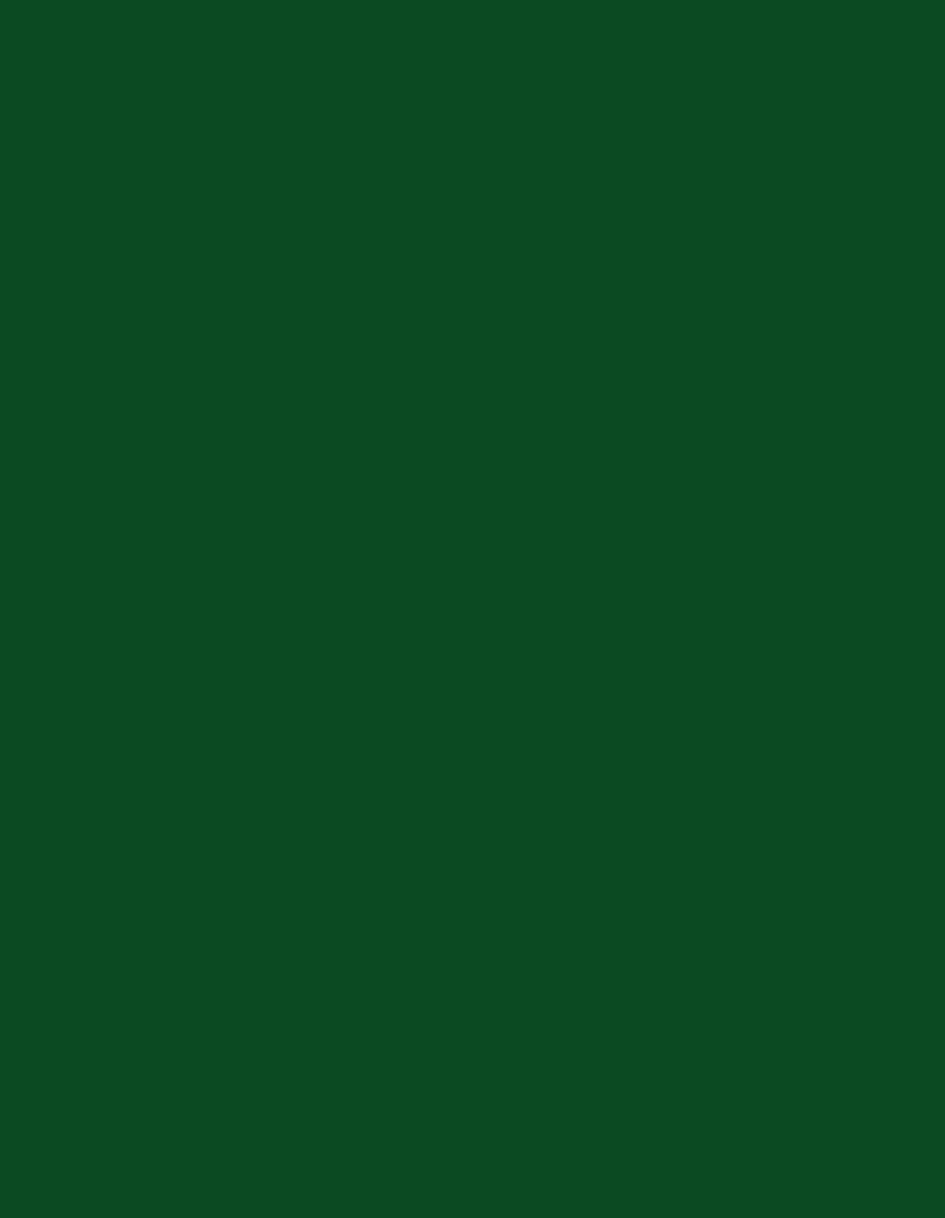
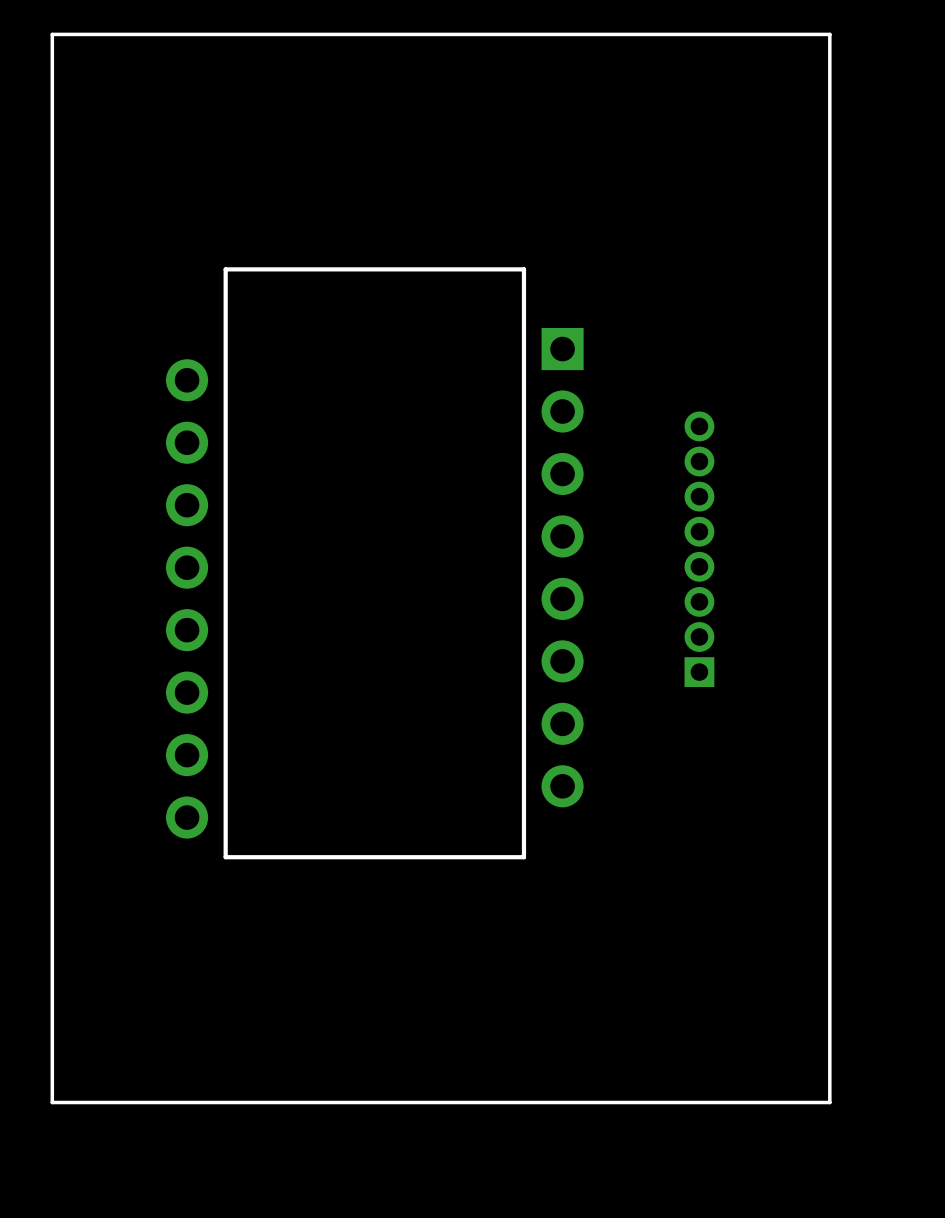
board edge: none -> (829, 34) (52, 34) (52, 1102) (829, 1102) (829, 34)
part: none -> (699, 549)
part: none -> (374, 563)

